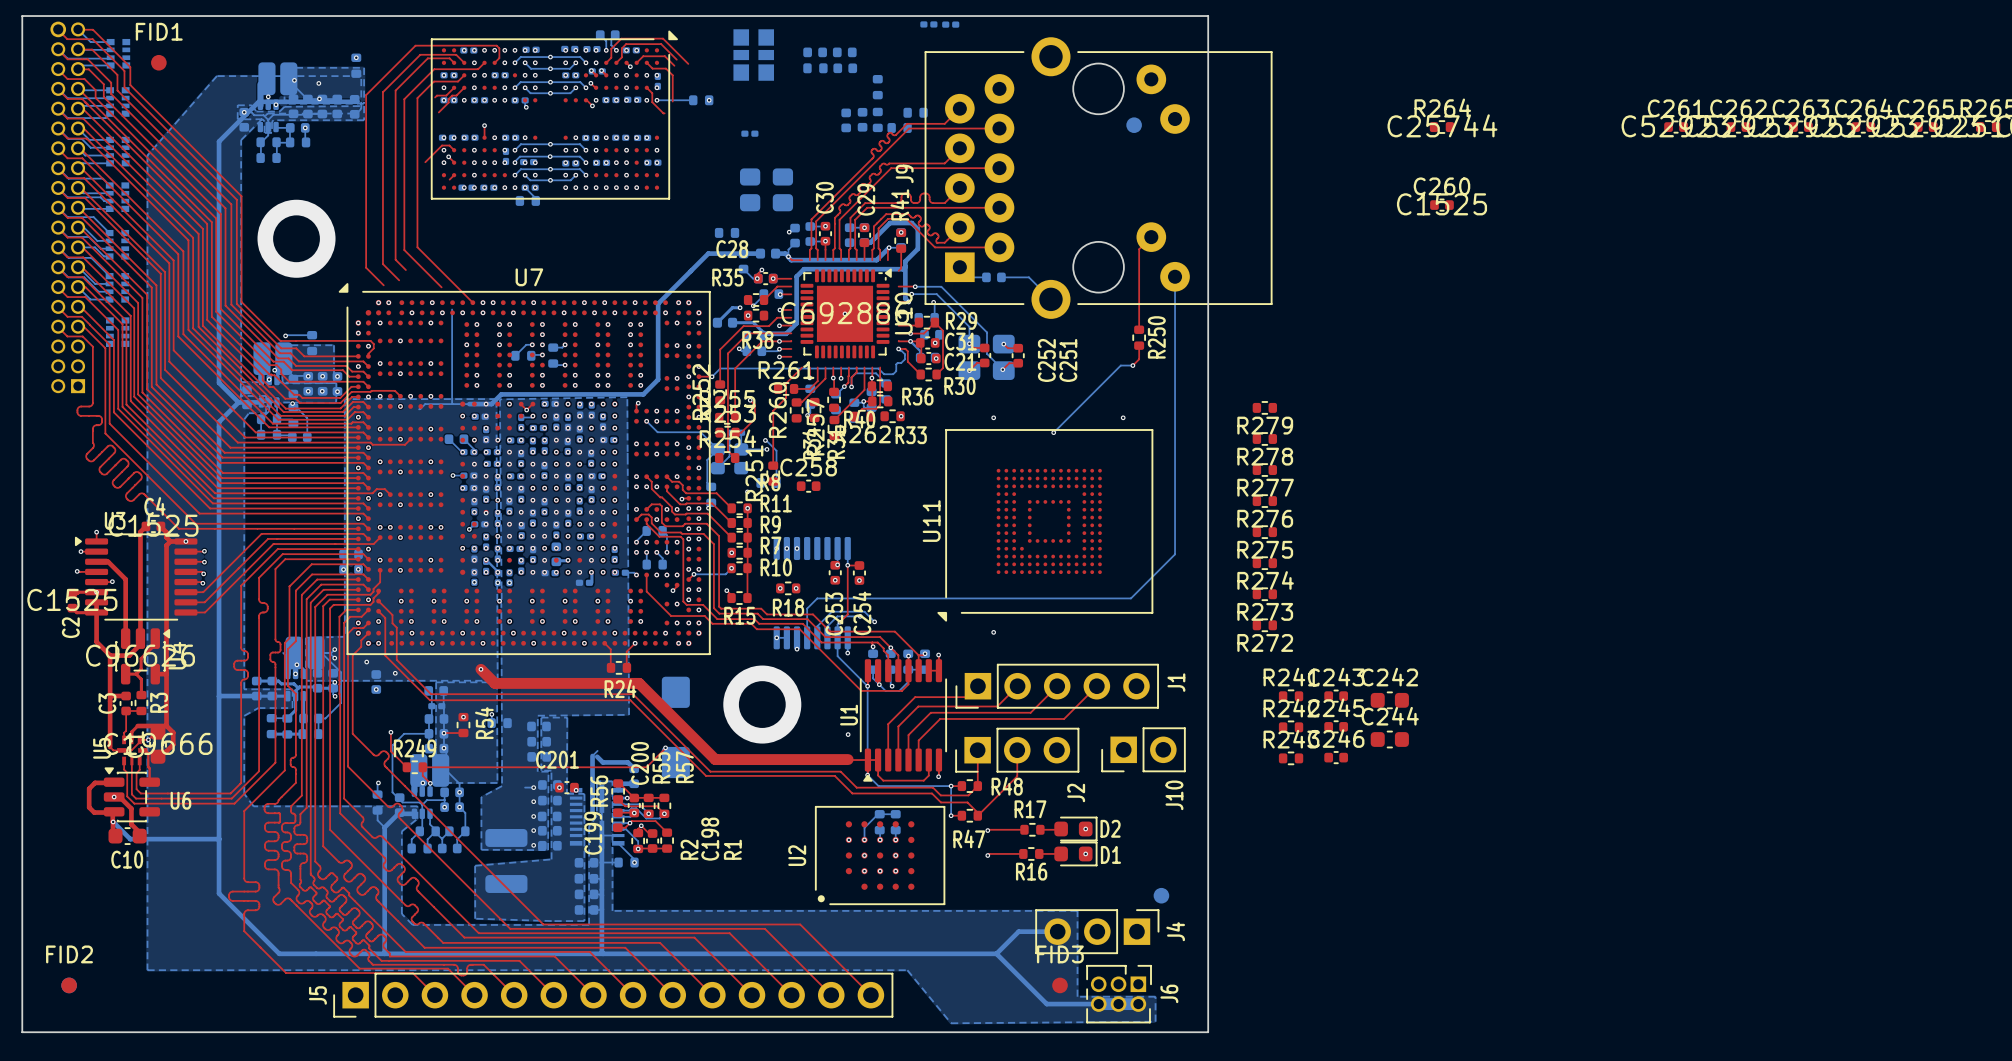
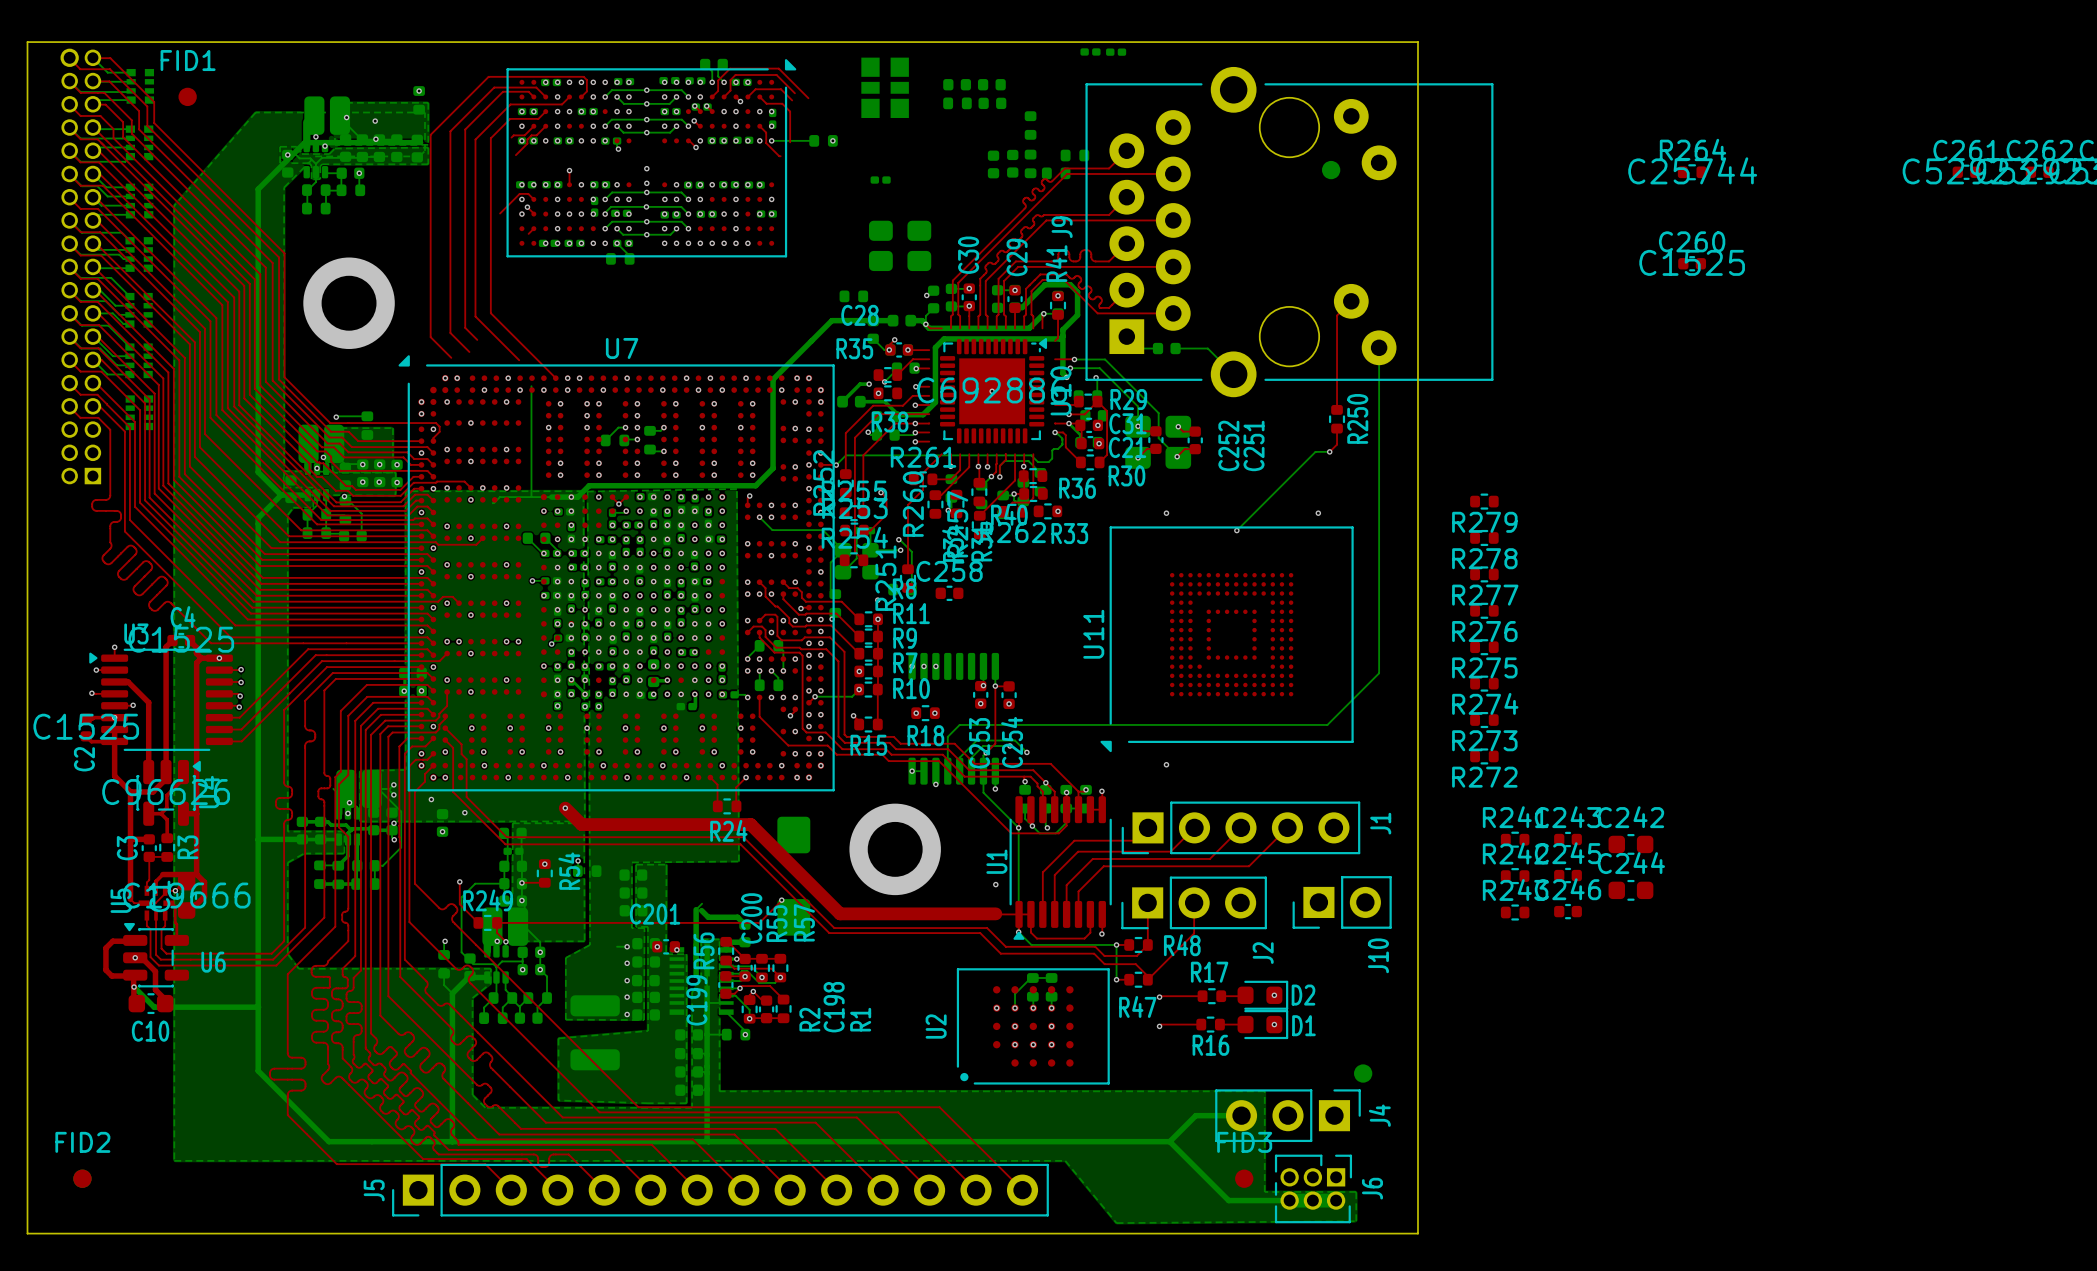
via: none -> (646, 168)
via: none -> (646, 183)
via: (630, 324) -> none
via: (630, 334) -> none
via: (597, 375) -> none
via: (597, 385) -> none

